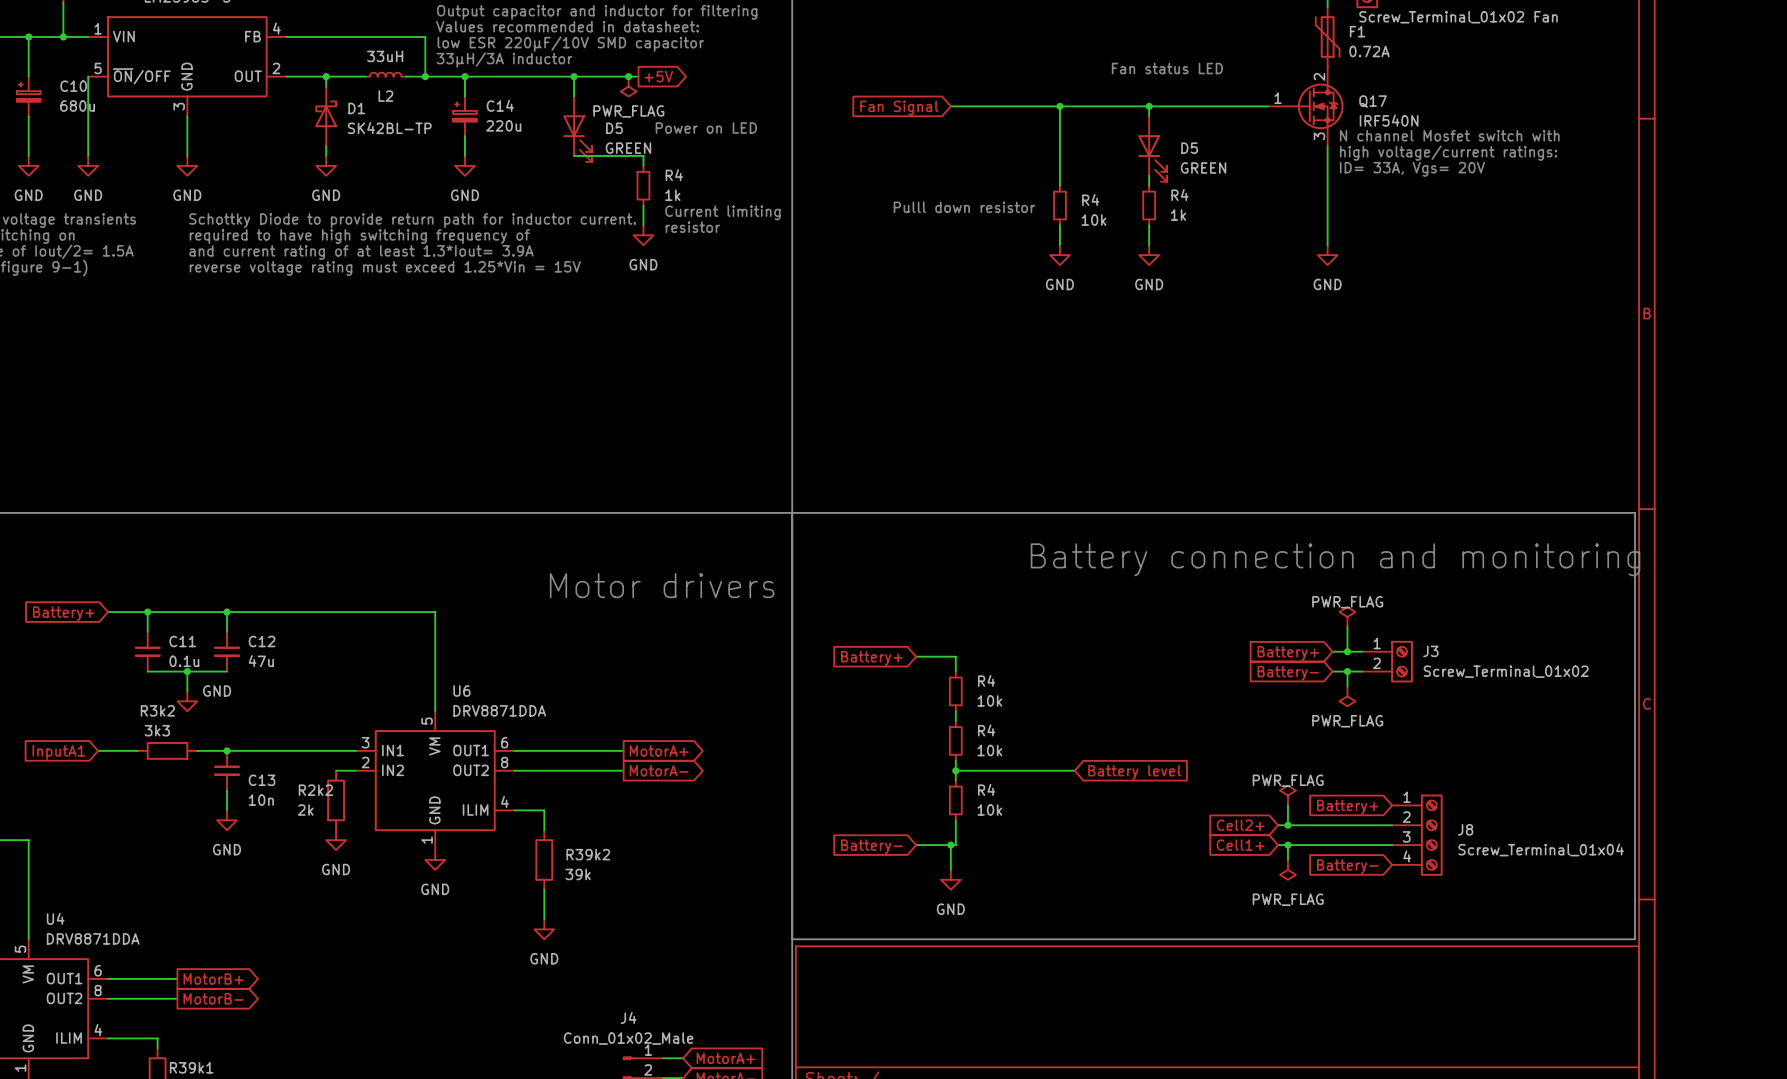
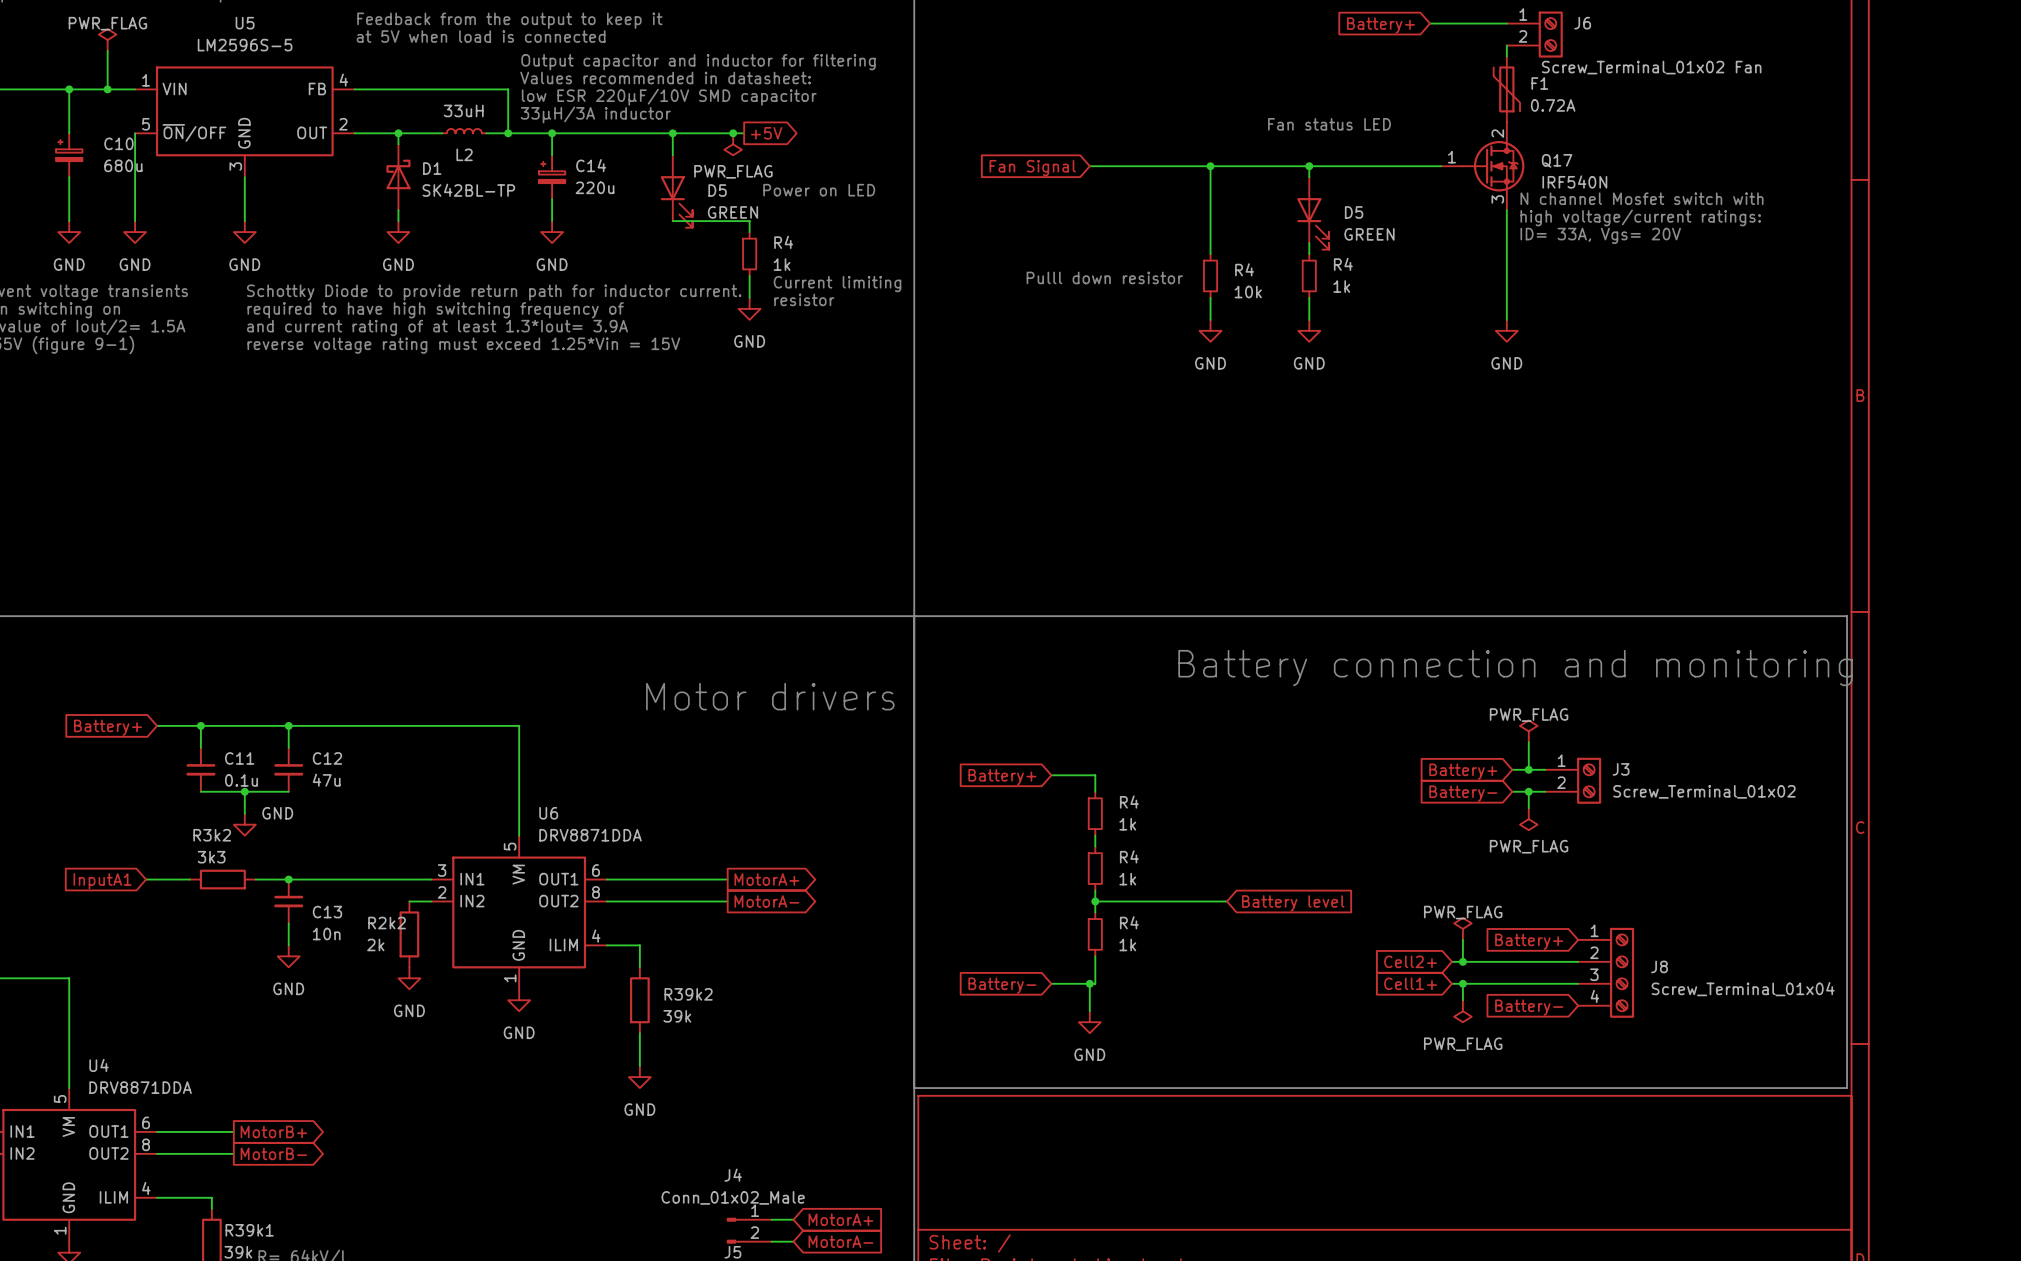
R4 value: 10k (989, 700) -> 1k (1127, 824)
R4 value: 10k (989, 750) -> 1k (1127, 879)
R4 value: 10k (989, 810) -> 1k (1127, 944)

